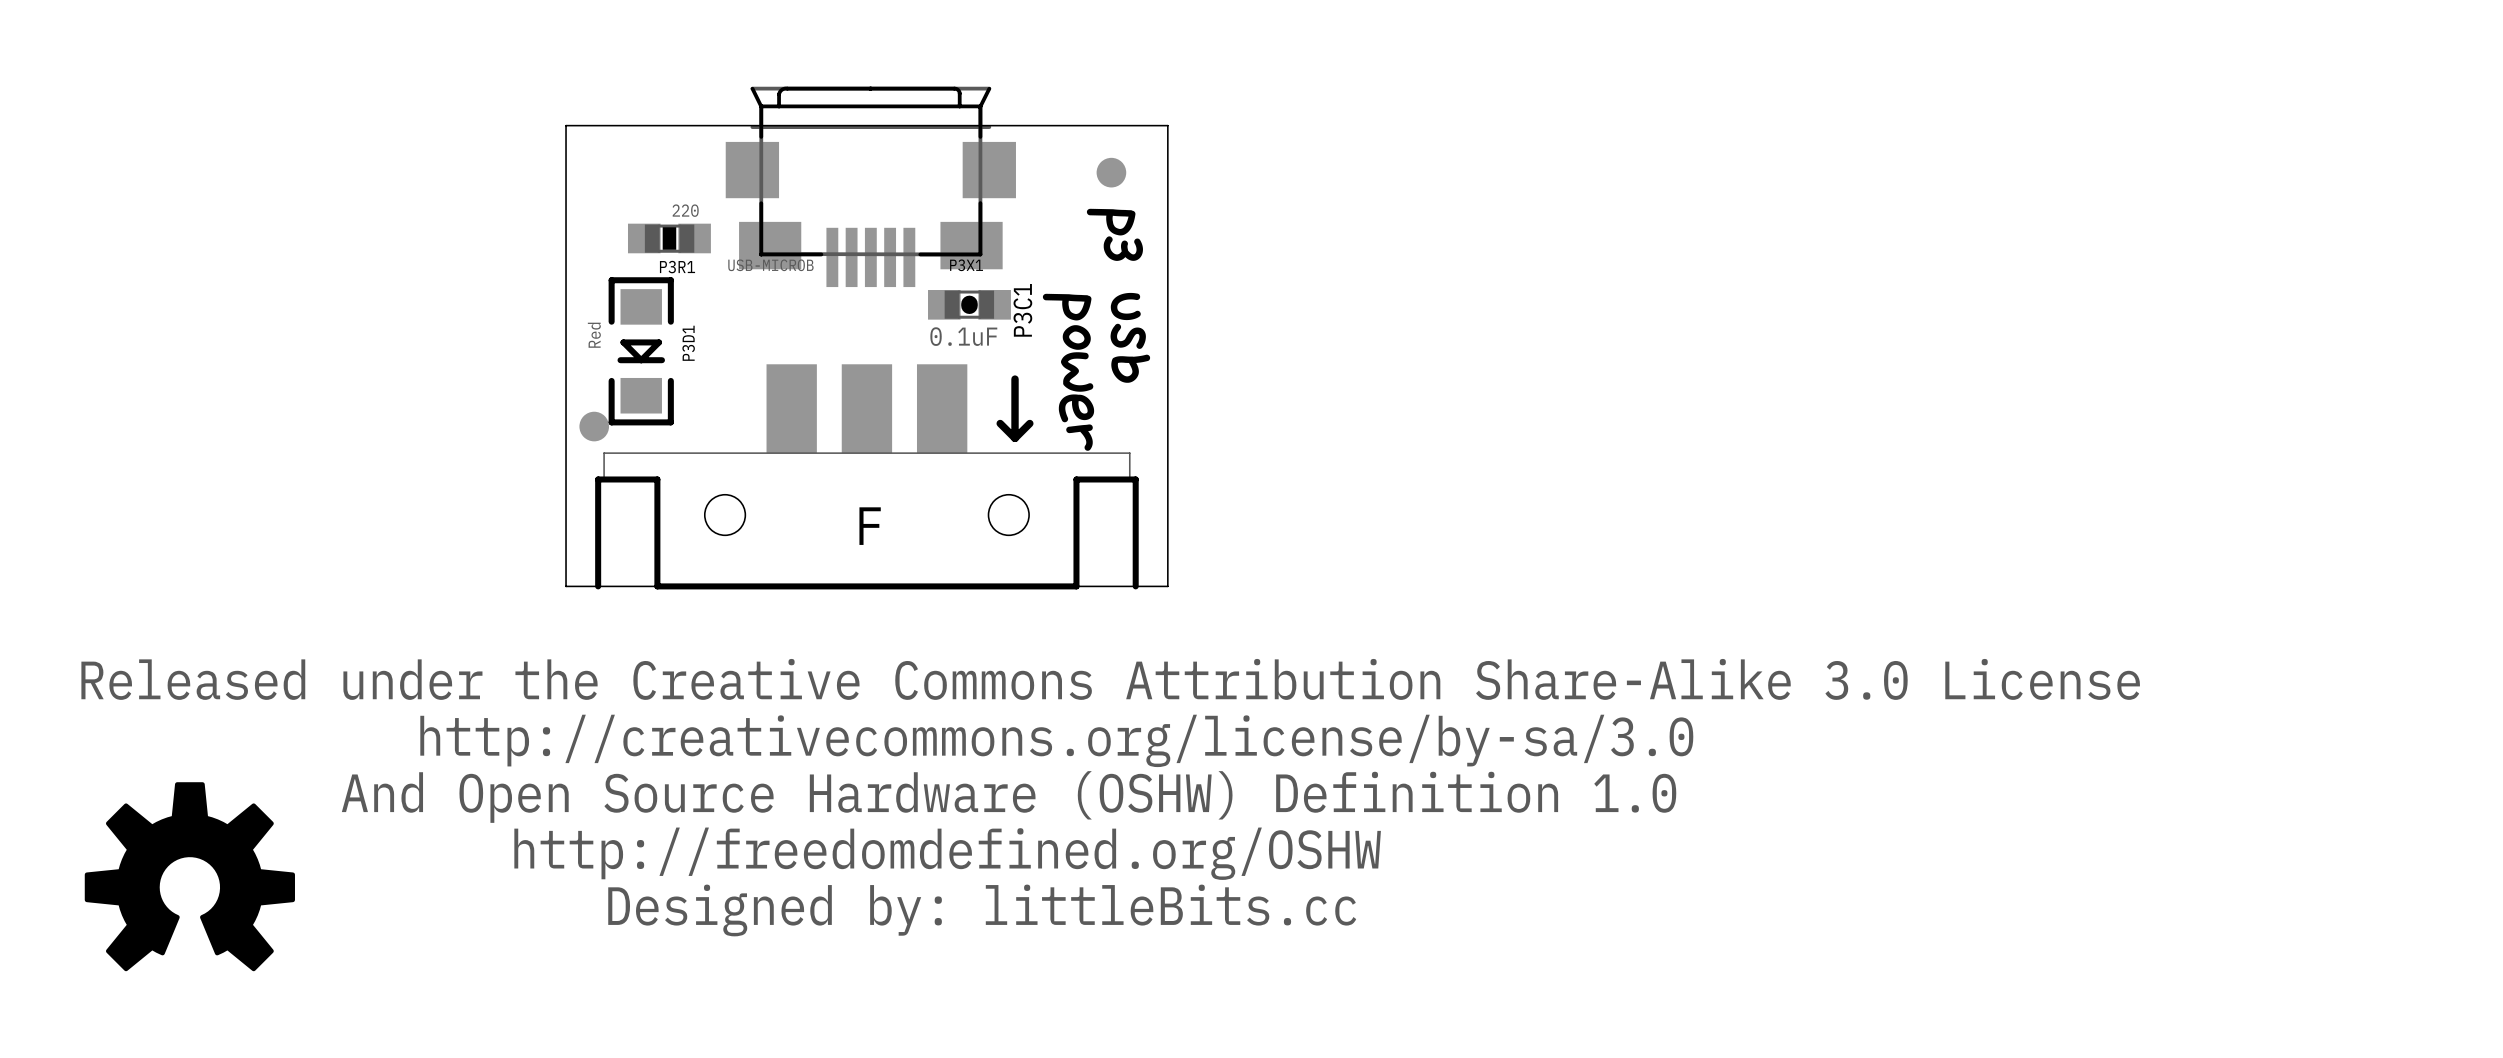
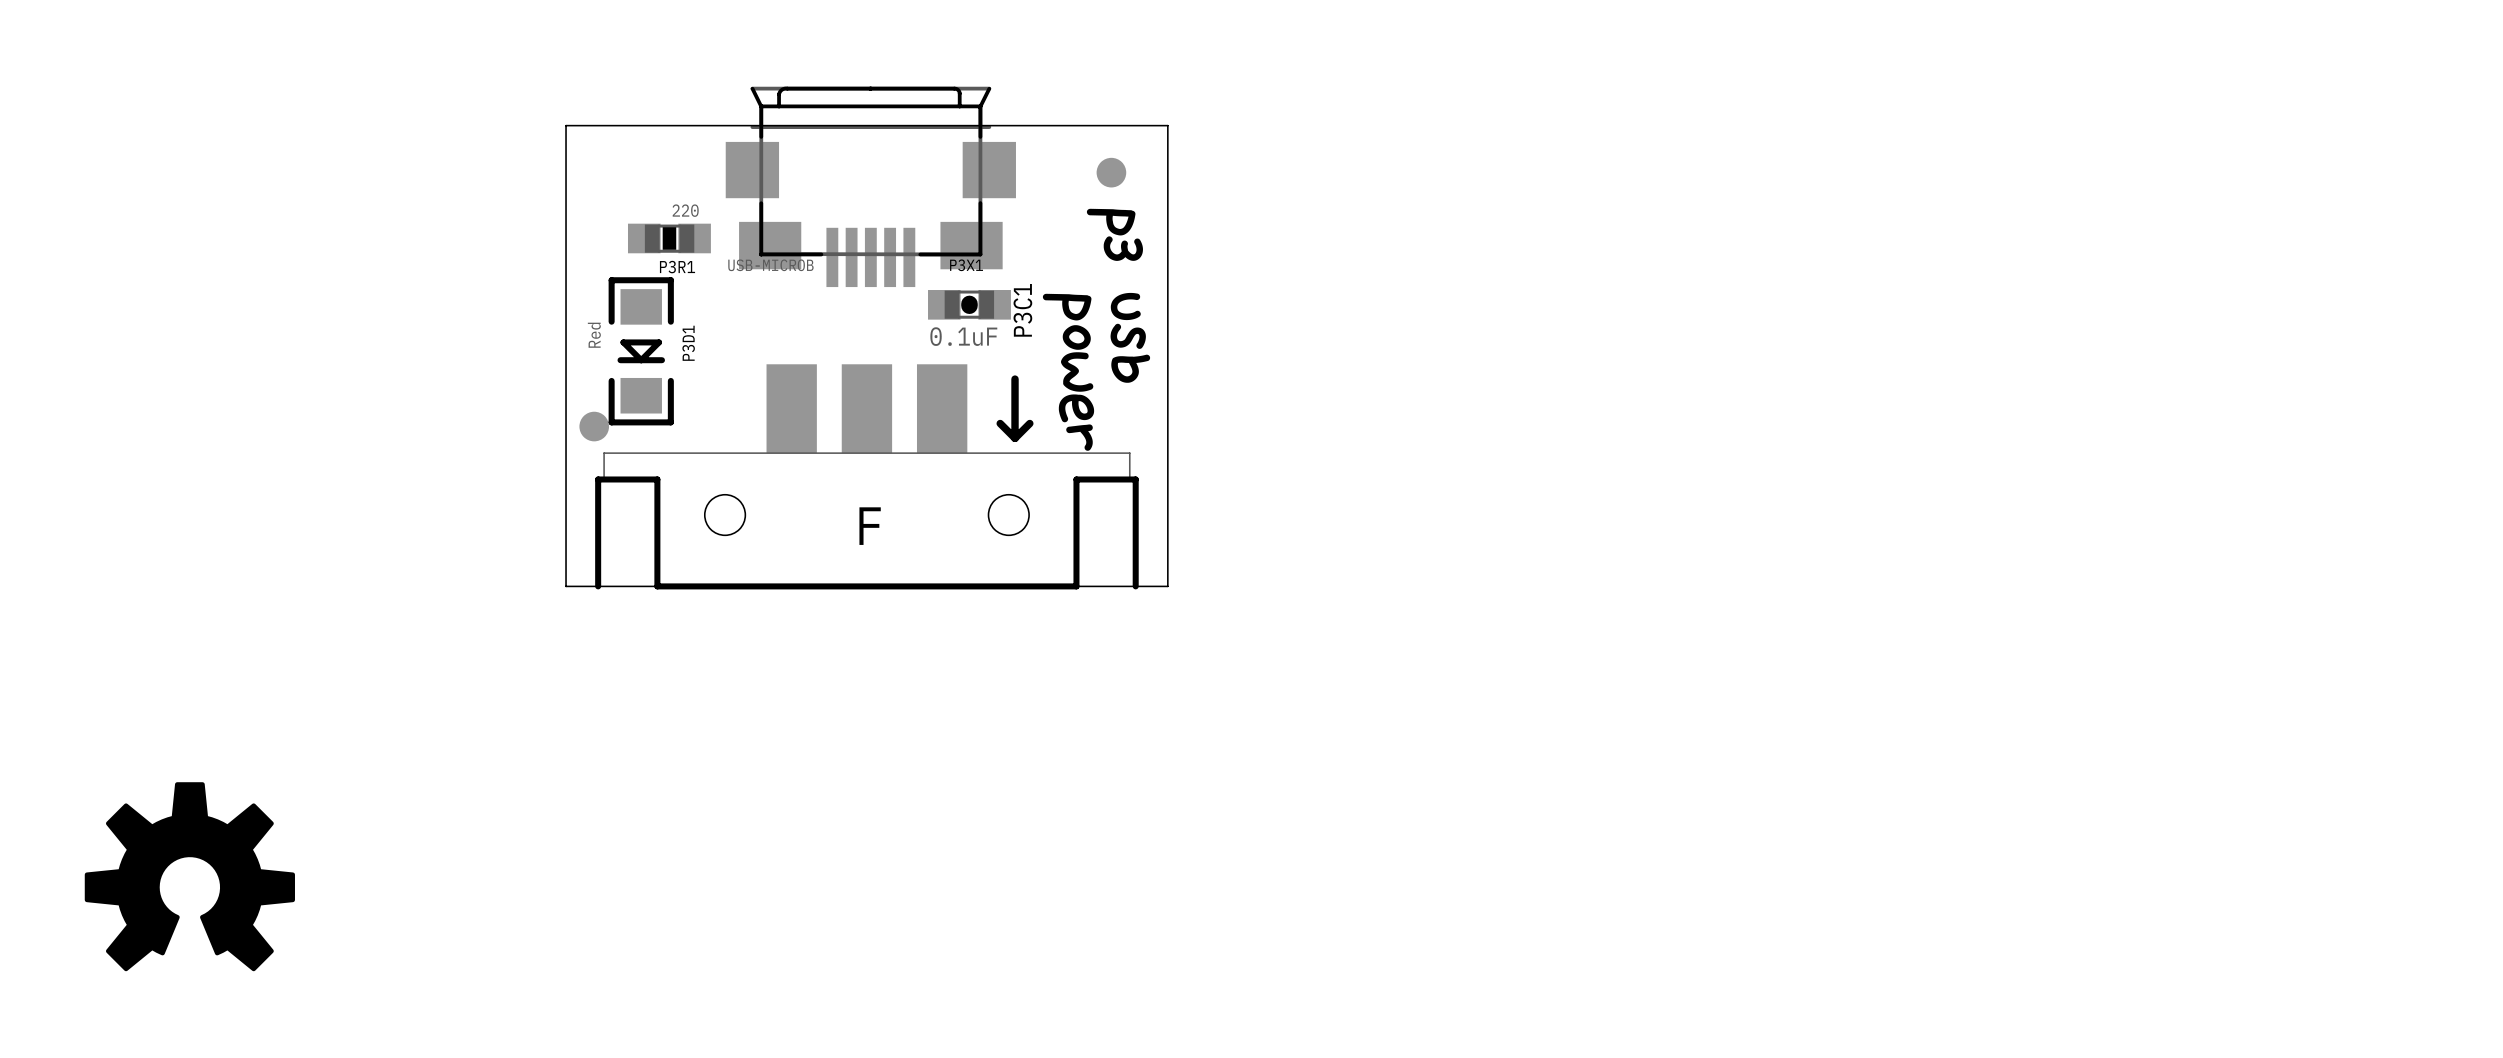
drawing: [81, 658, 2140, 937] -> none

